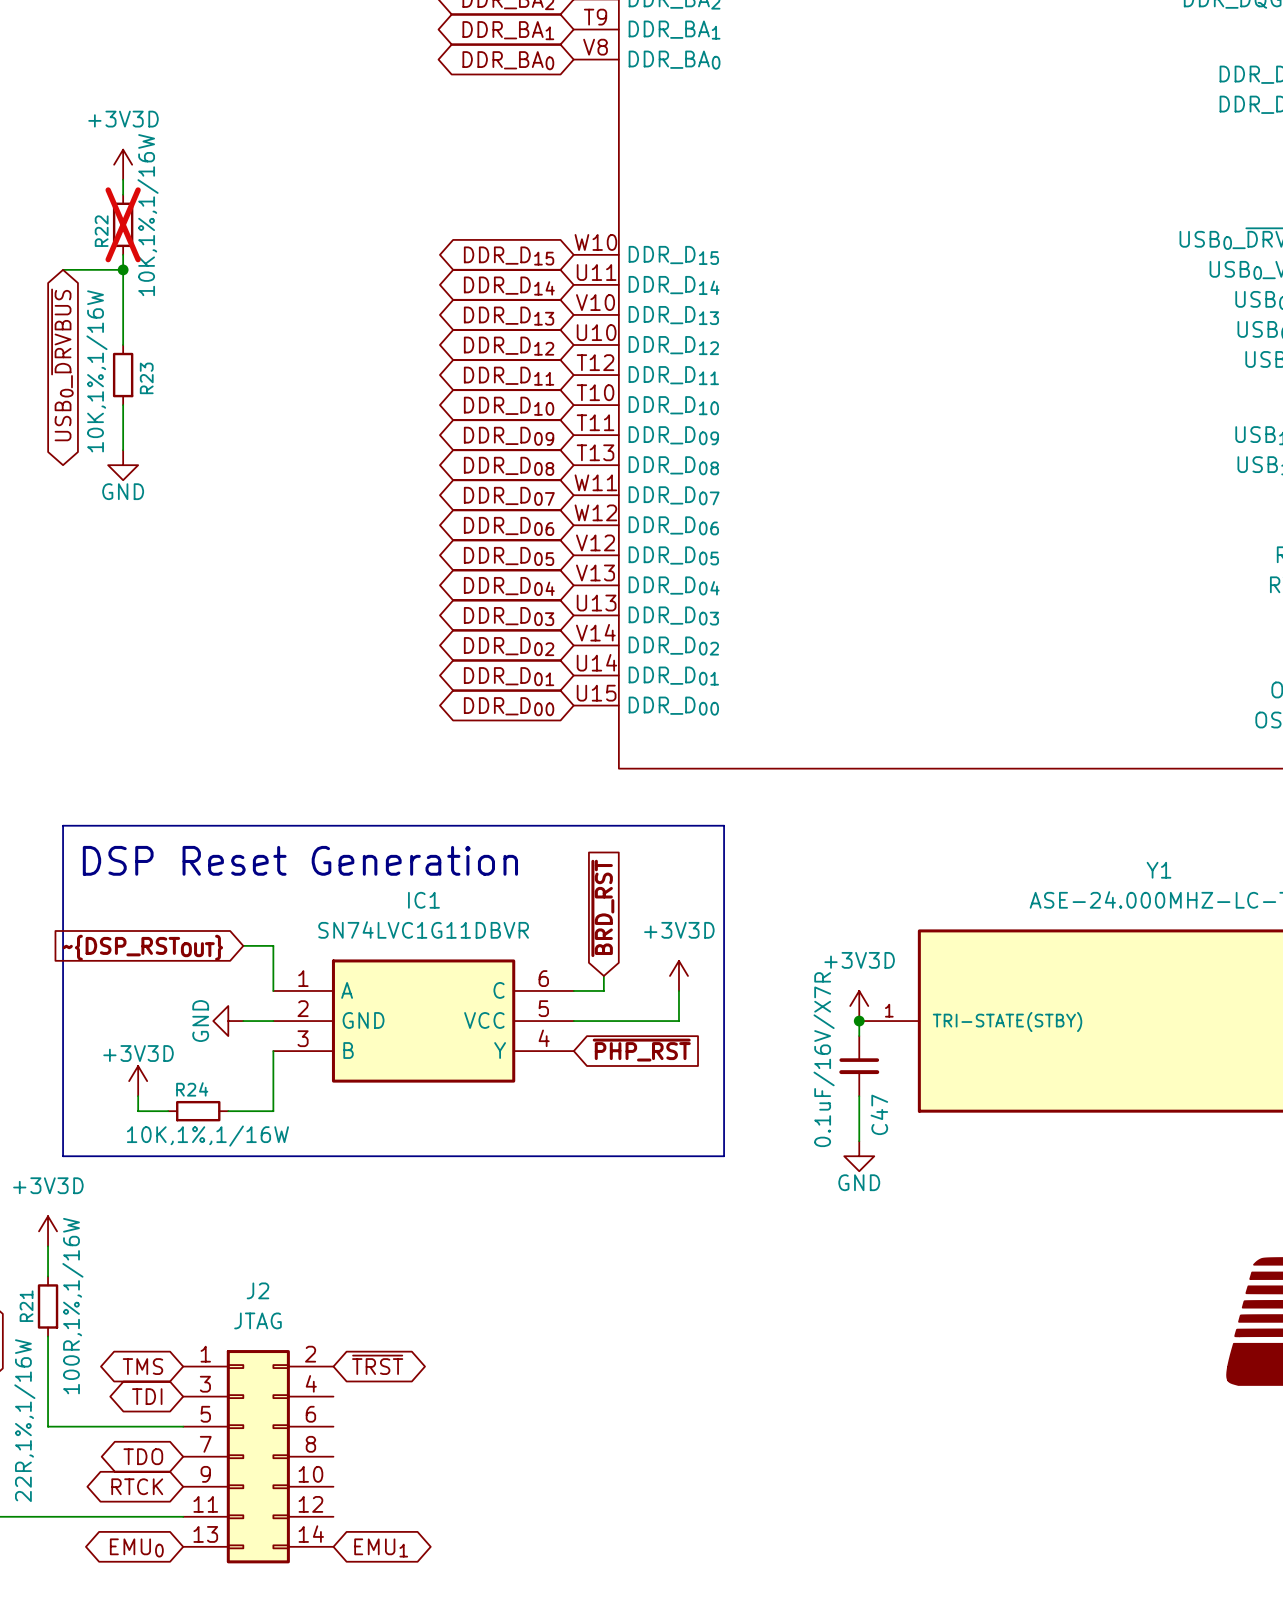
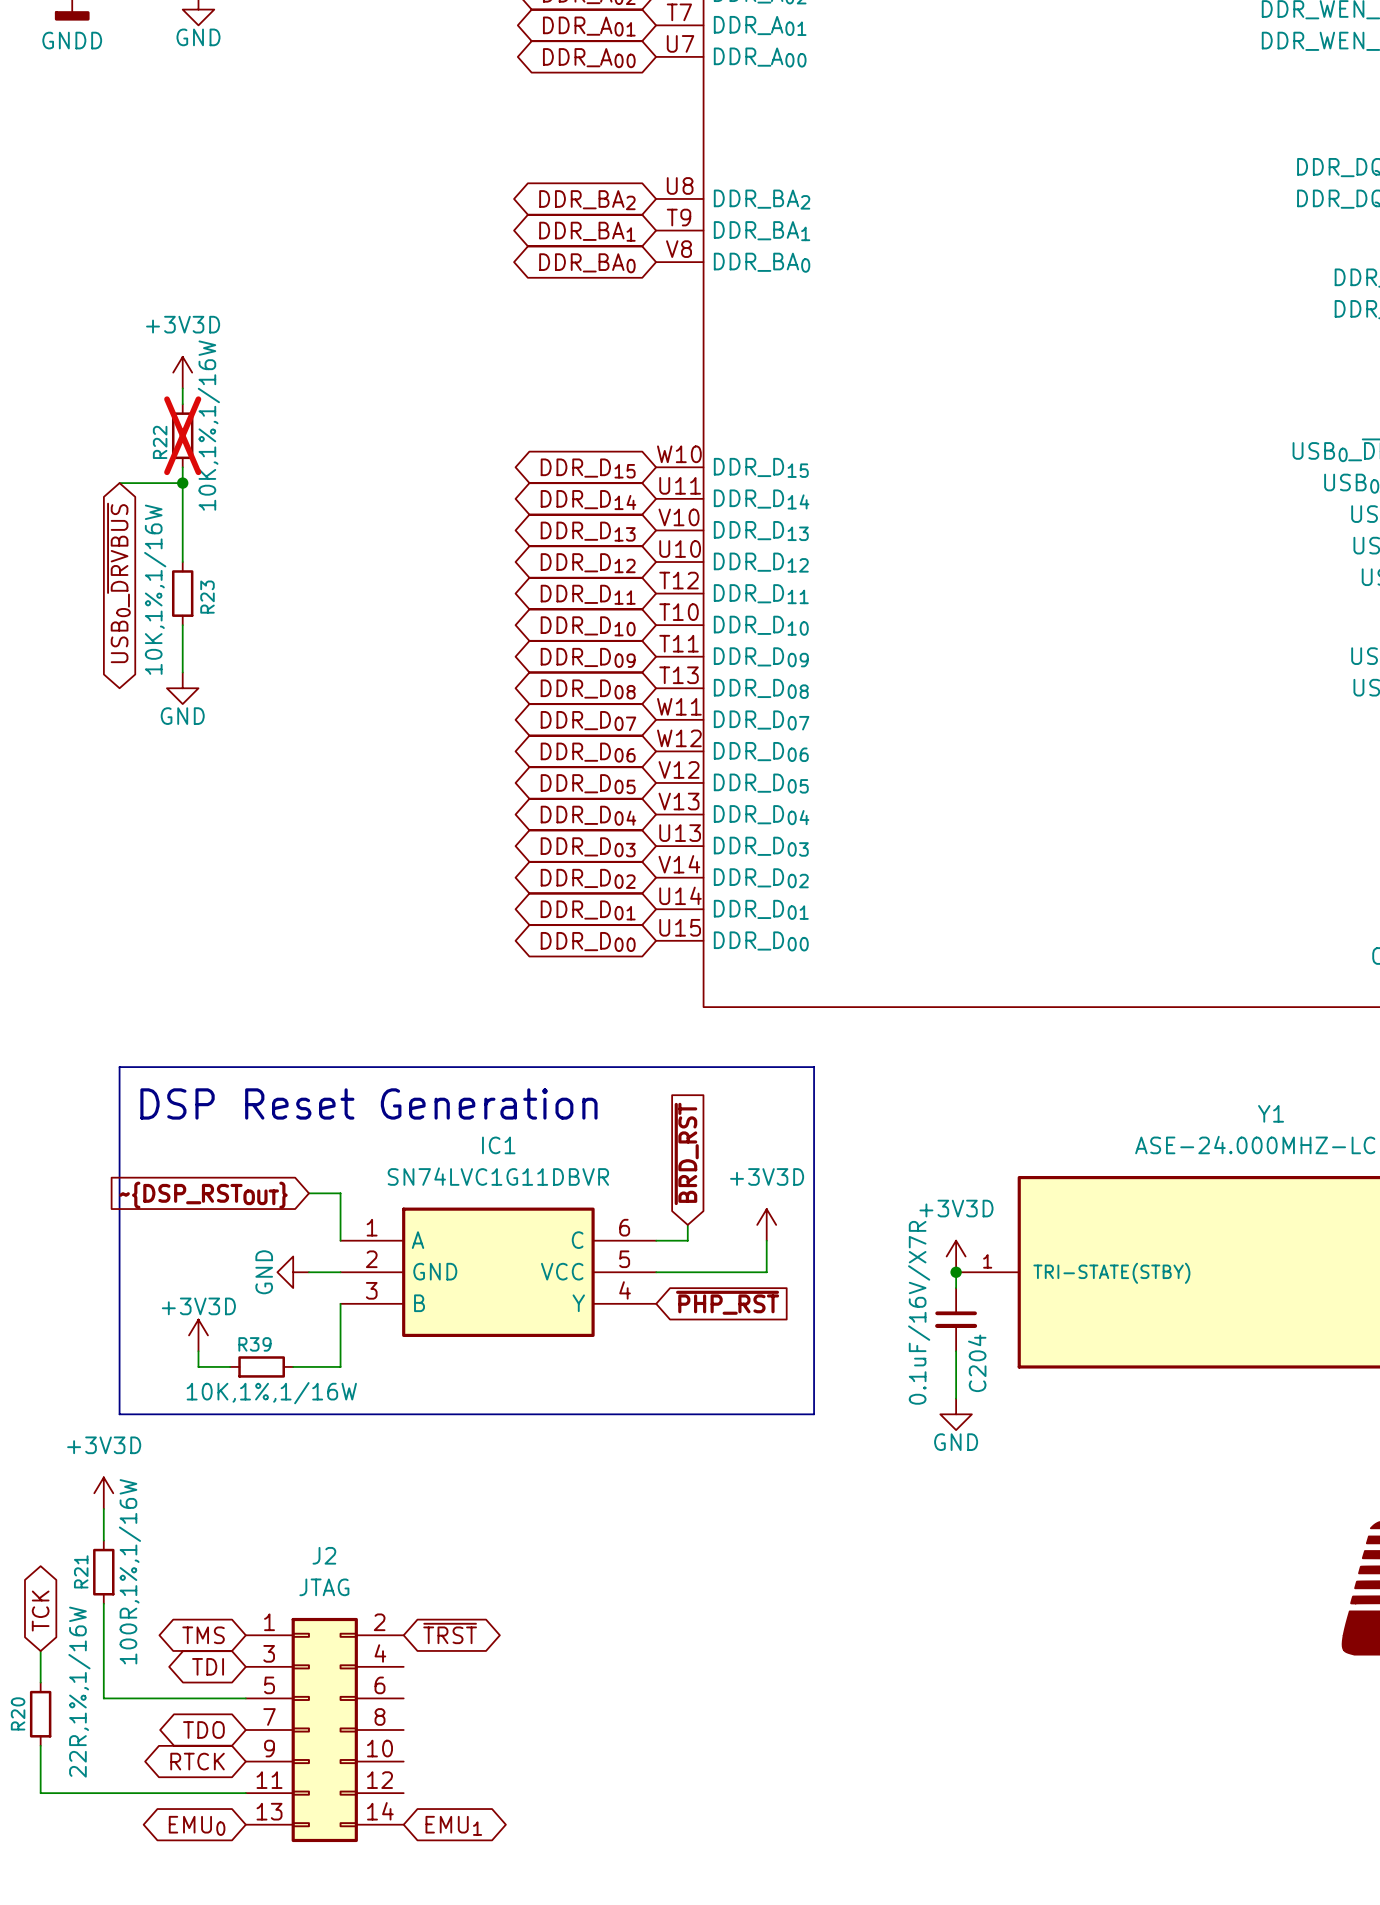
R24 name: R24 (192, 1089) -> R39 (254, 1344)
C47 name: C47 (879, 1114) -> C204 (977, 1363)

